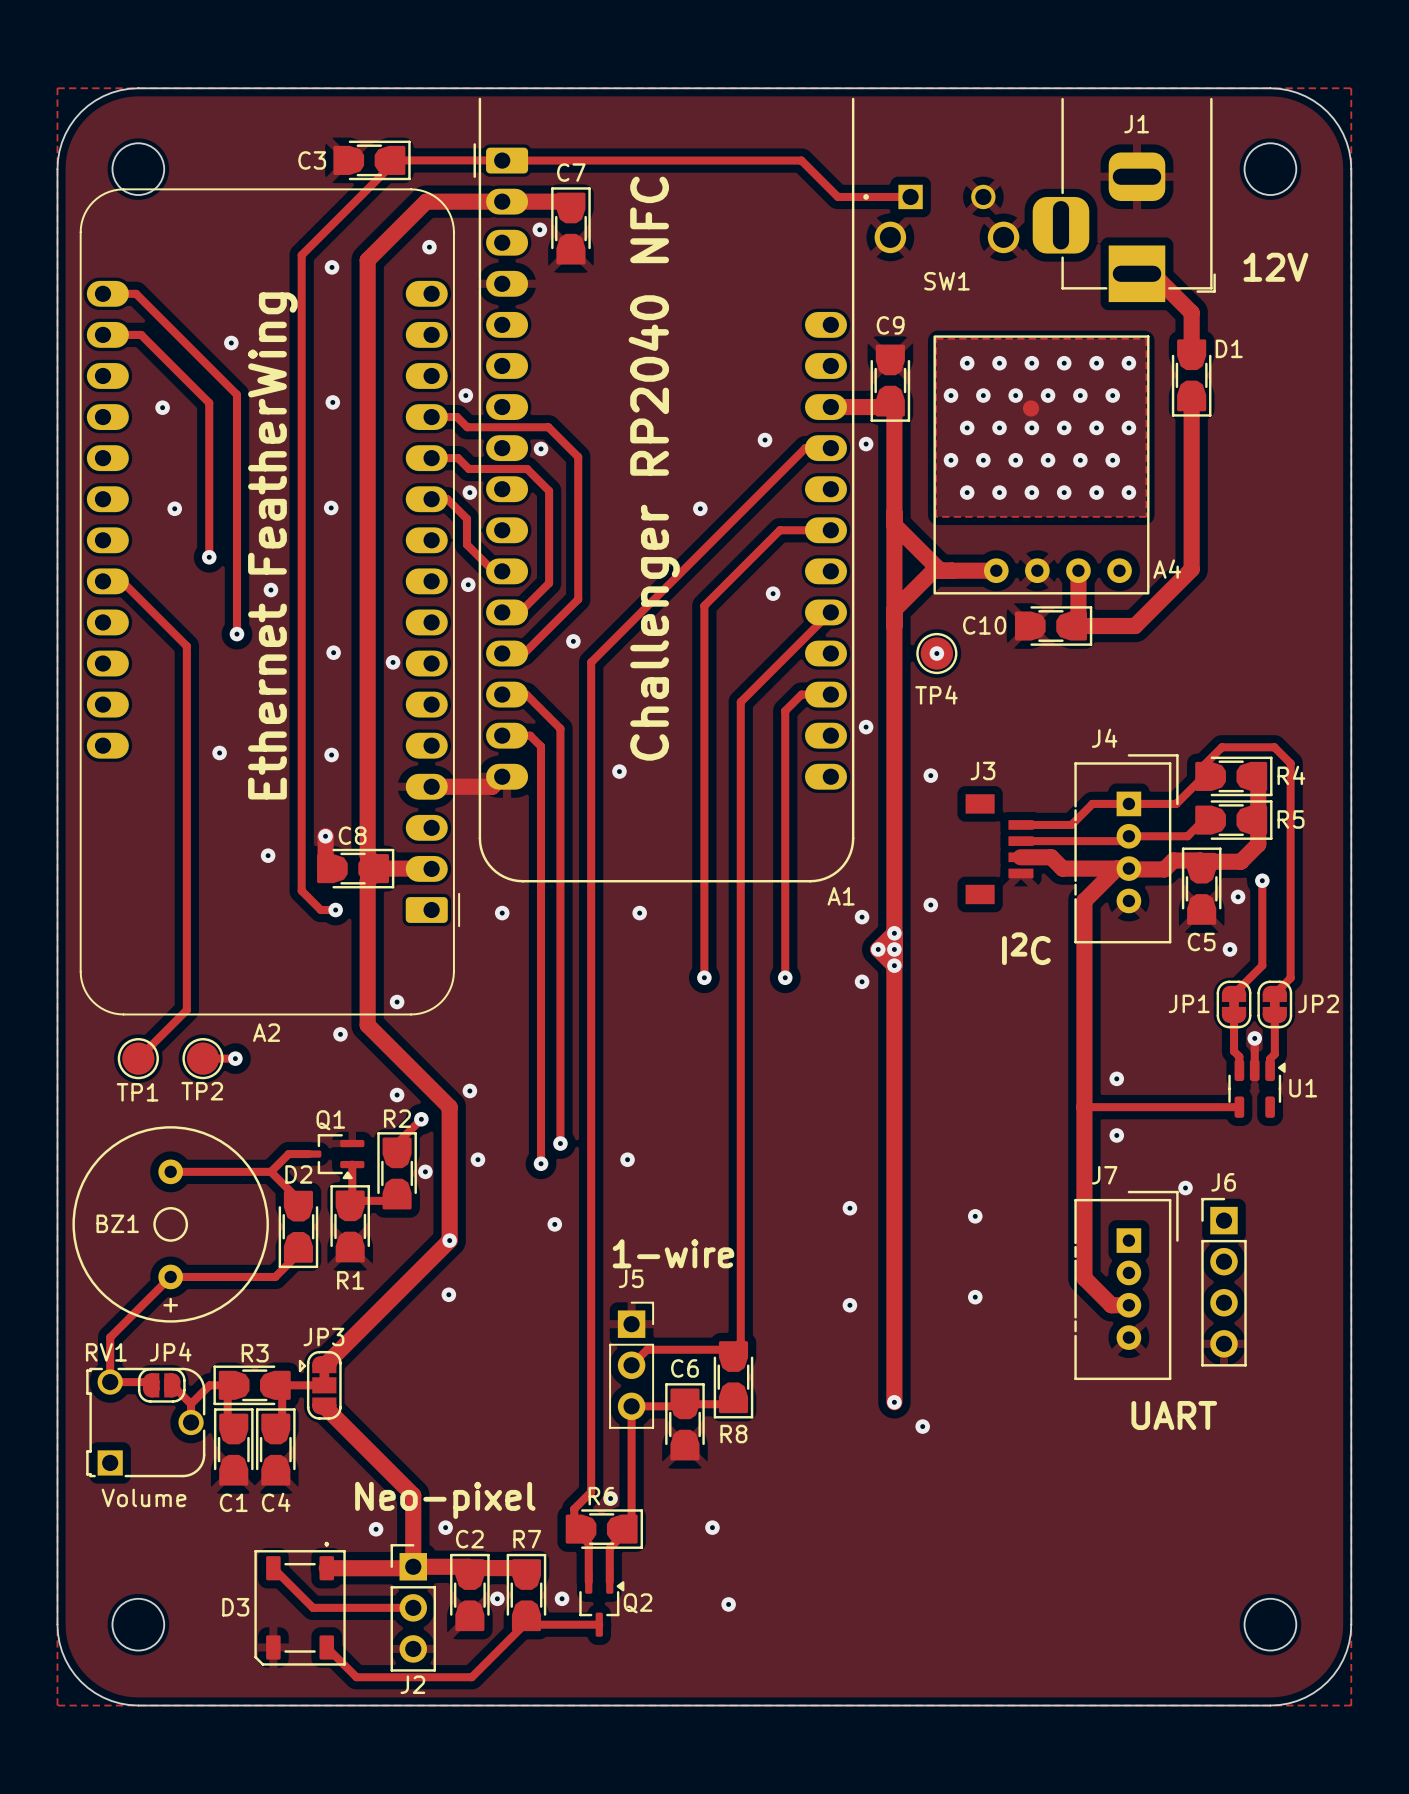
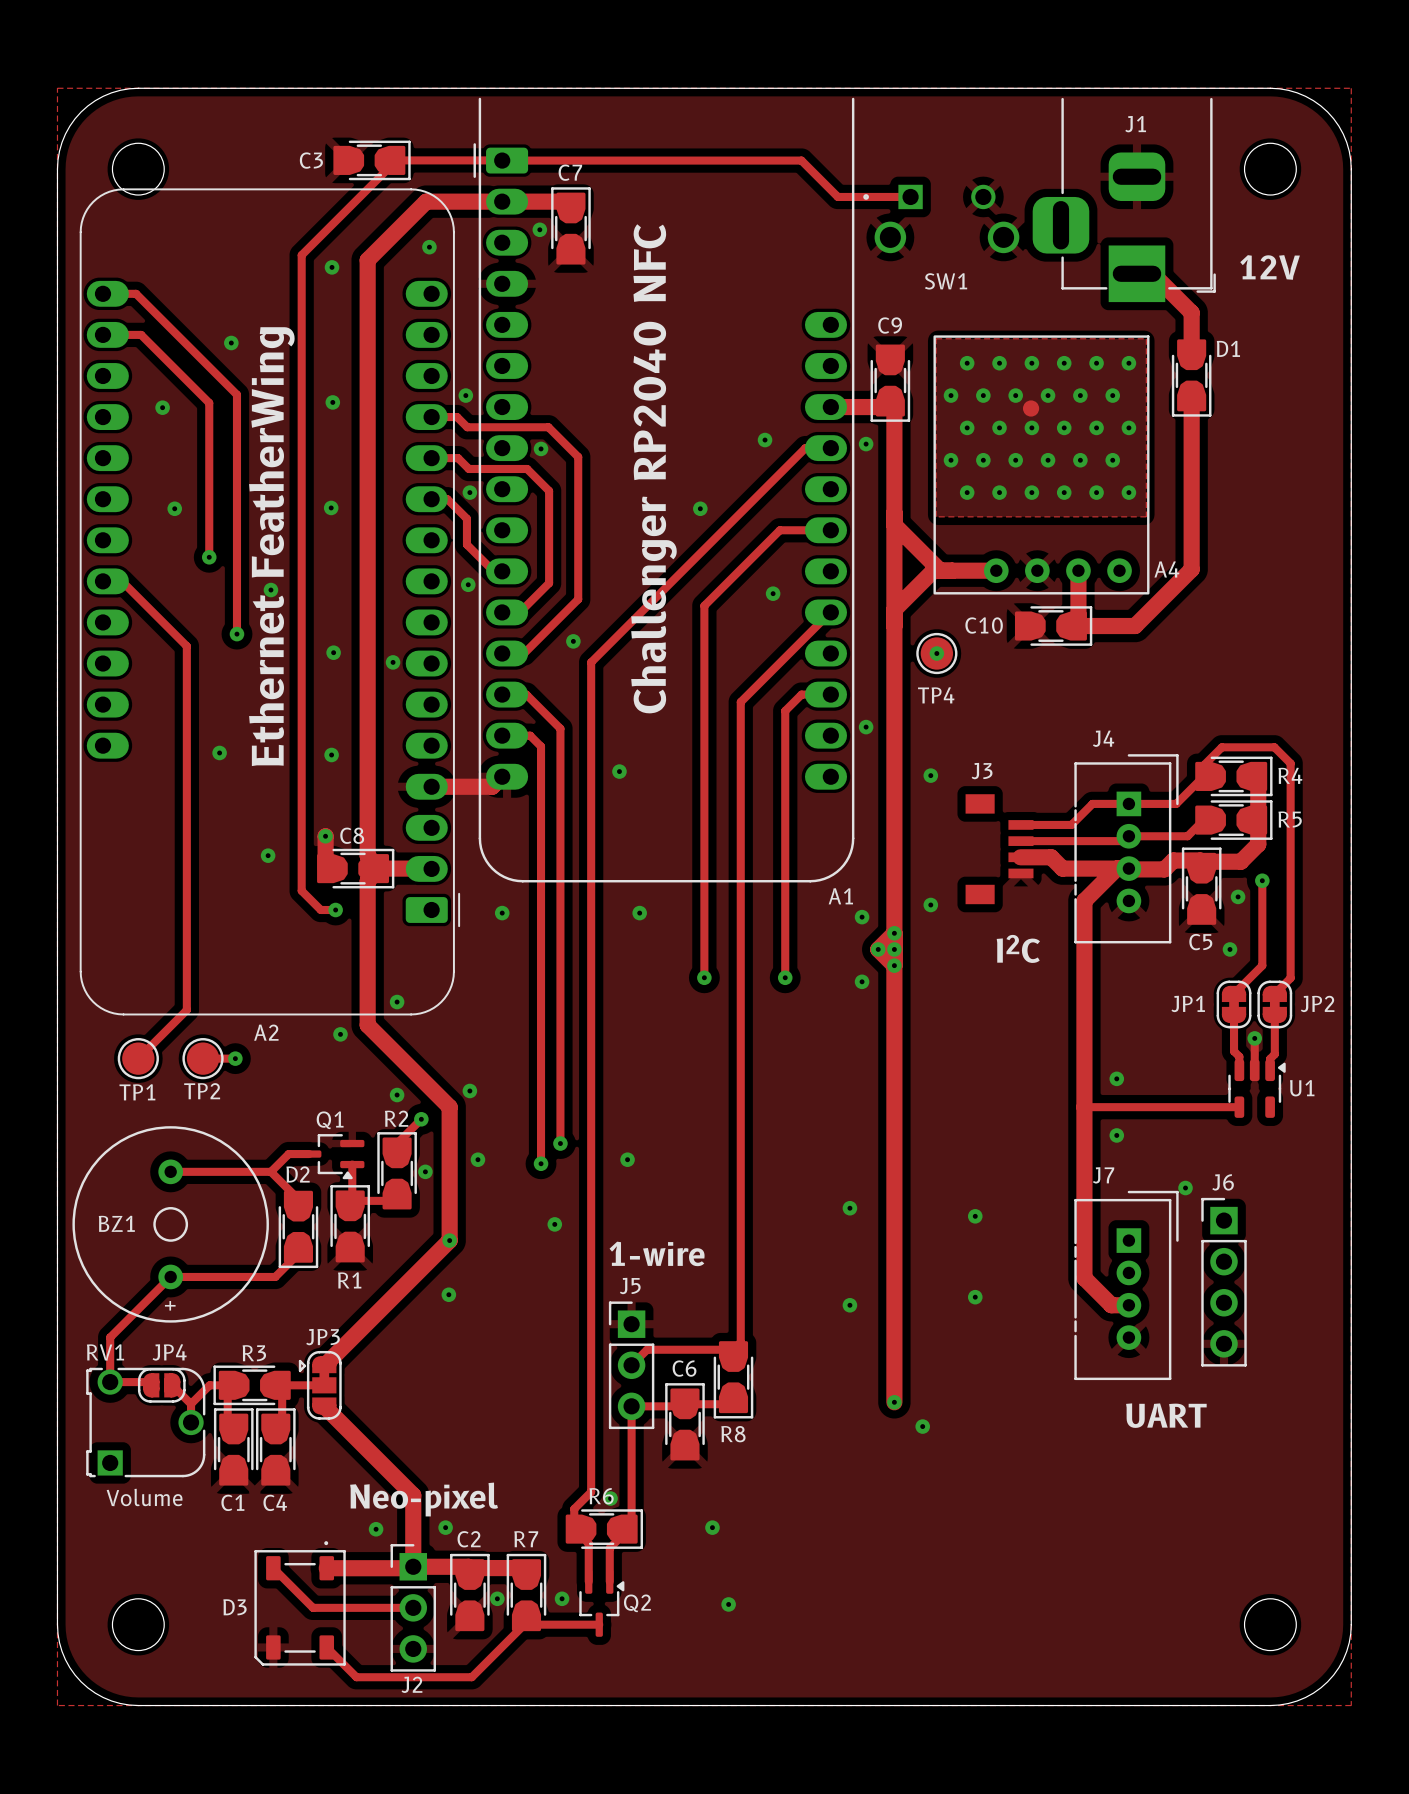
J5 footprint: [609, 1301, 655, 1429] -> [608, 1301, 655, 1430]

